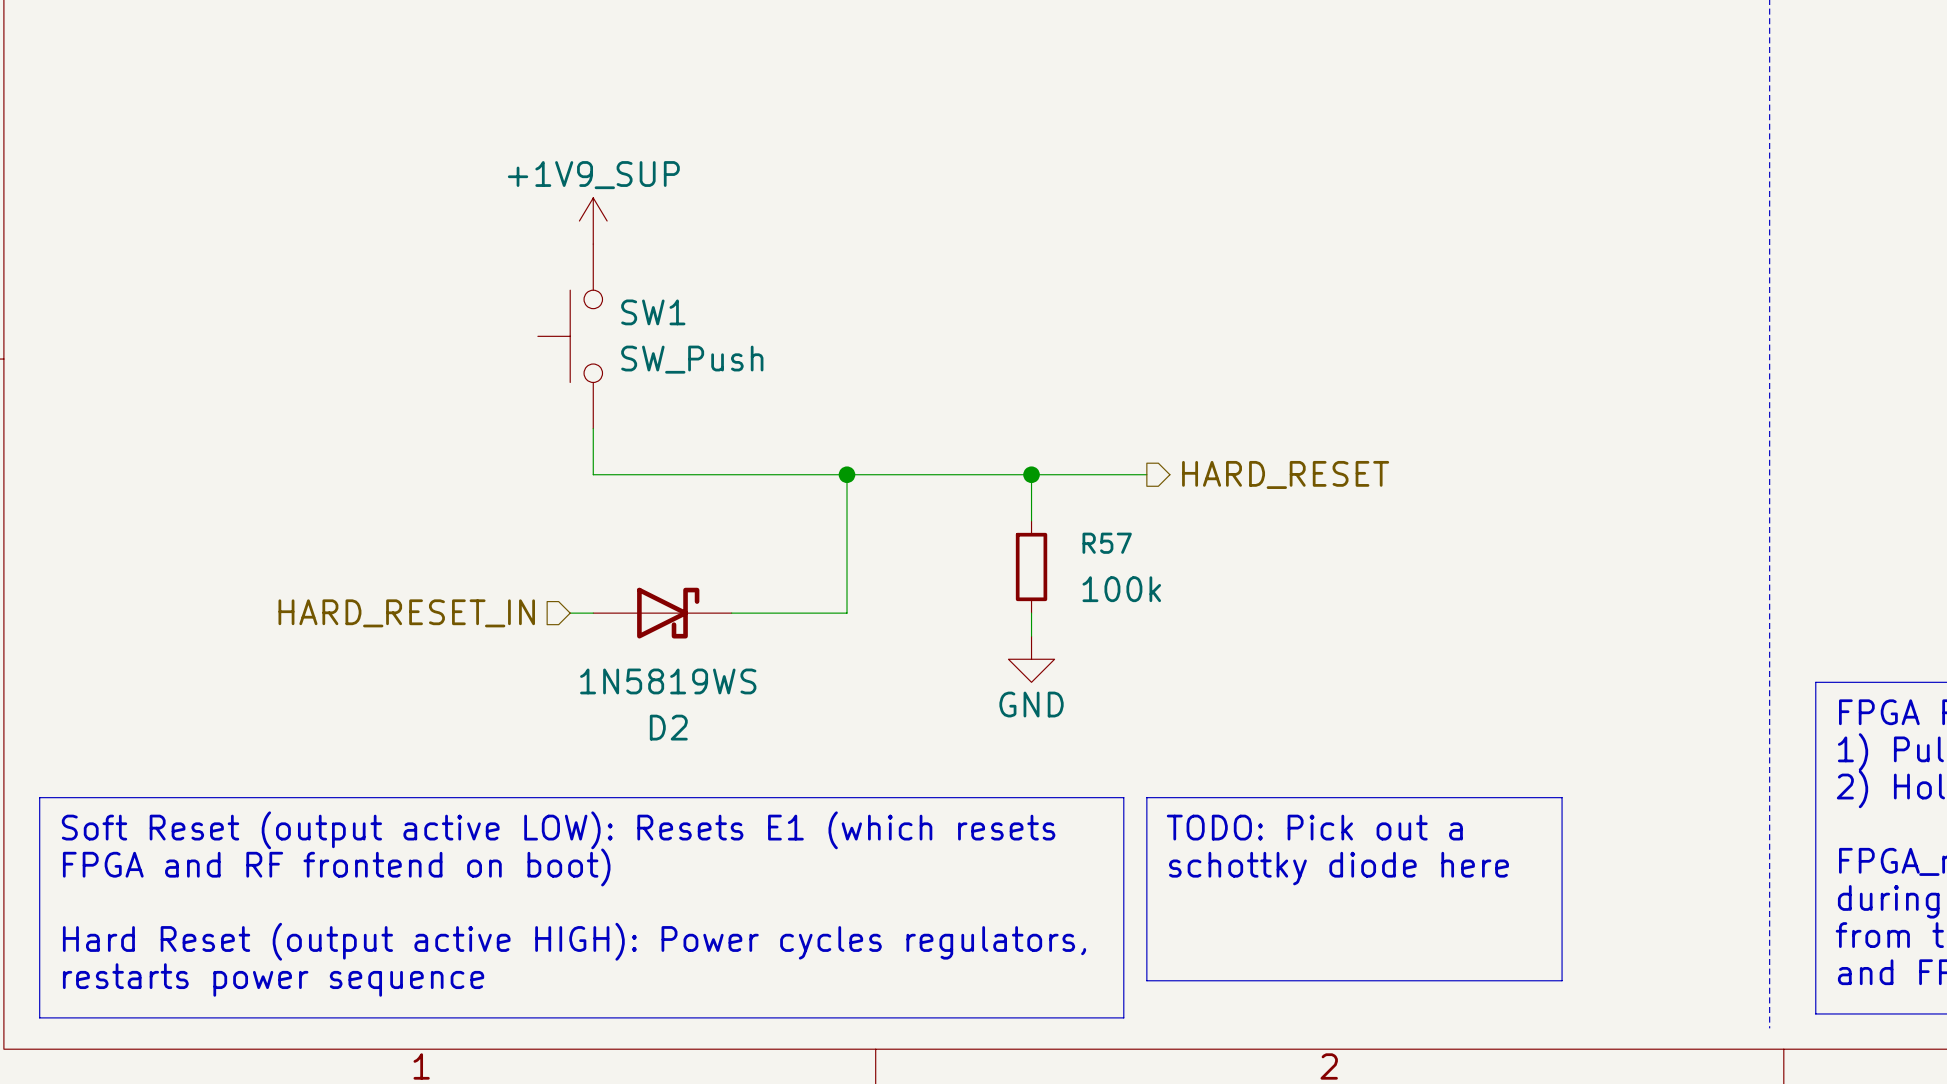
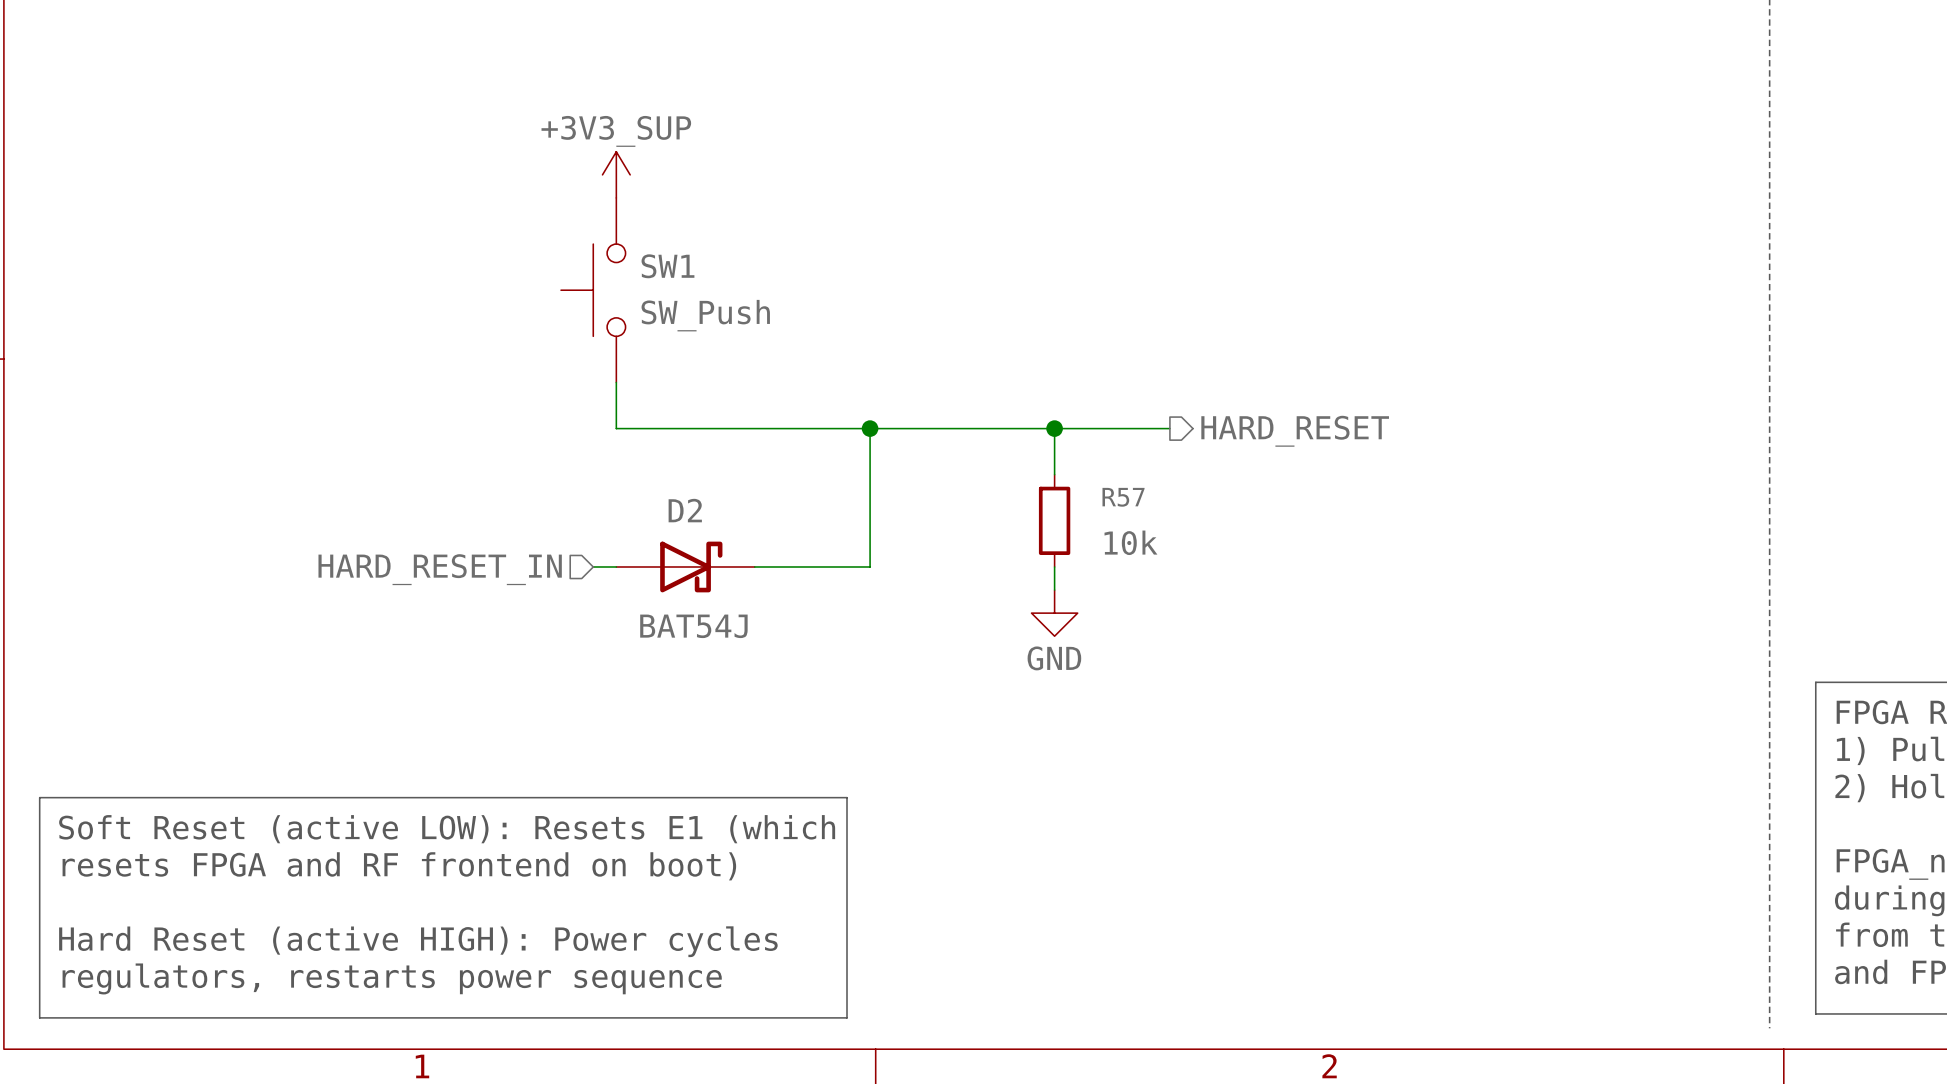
power symbol: none -> +3V3_SUP (616, 174)
power symbol: +1V9_SUP (593, 221) -> none
SW1 position: (570, 336) -> (593, 290)
wire: (593, 428) (593, 474) (1146, 474) -> (616, 382) (616, 428) (1169, 428)
wire: (847, 474) (847, 613) (731, 613) -> (870, 428) (870, 566) (754, 566)
junction position: (847, 474) -> (870, 428)
wire: (1031, 474) (1031, 520) -> (1054, 428) (1054, 474)
junction position: (1031, 474) -> (1054, 428)
hierarchical label position: HARD_RESET (1285, 474) -> HARD_RESET (1295, 431)
R57 position: (1031, 566) -> (1054, 520)
R57 value: 100k (1121, 589) -> 10k (1130, 542)
hierarchical label position: HARD_RESET_IN (406, 613) -> HARD_RESET_IN (440, 569)
wire: (570, 613) (593, 613) -> (593, 566) (616, 566)
D2 position: (662, 613) -> (685, 566)
wire: (1031, 613) (1031, 636) -> (1054, 566) (1054, 590)
power symbol position: GND (1031, 659) -> GND (1054, 613)
D2 value: 1N5819WS (668, 681) -> BAT54J (693, 626)
D2 name position: D2 (668, 727) -> D2 (685, 510)
line: (847, 797) (1123, 797) (1123, 1017) (847, 1017) -> (847, 797) (847, 1017)
line: (1146, 797) (1562, 797) (1562, 980) (1146, 980) (1146, 797) -> none
text: TODO: Pick out a (1314, 827) -> none
text: Soft Reset (output active LOW): Resets E1 (which resets (558, 830) -> Soft Reset (active LOW): Resets E1 (which (447, 829)
text: FPGA and RF frontend on boot) (336, 867) -> resets FPGA and RF frontend on boot) (399, 866)
text: schottky diode here (1338, 868) -> none
text: Hard Reset (output active HIGH): Power cycles regulators, (574, 941) -> Hard Reset (active HIGH): Power cycles (418, 941)
text: restarts power sequence (273, 979) -> regulators, restarts power sequence (392, 978)

